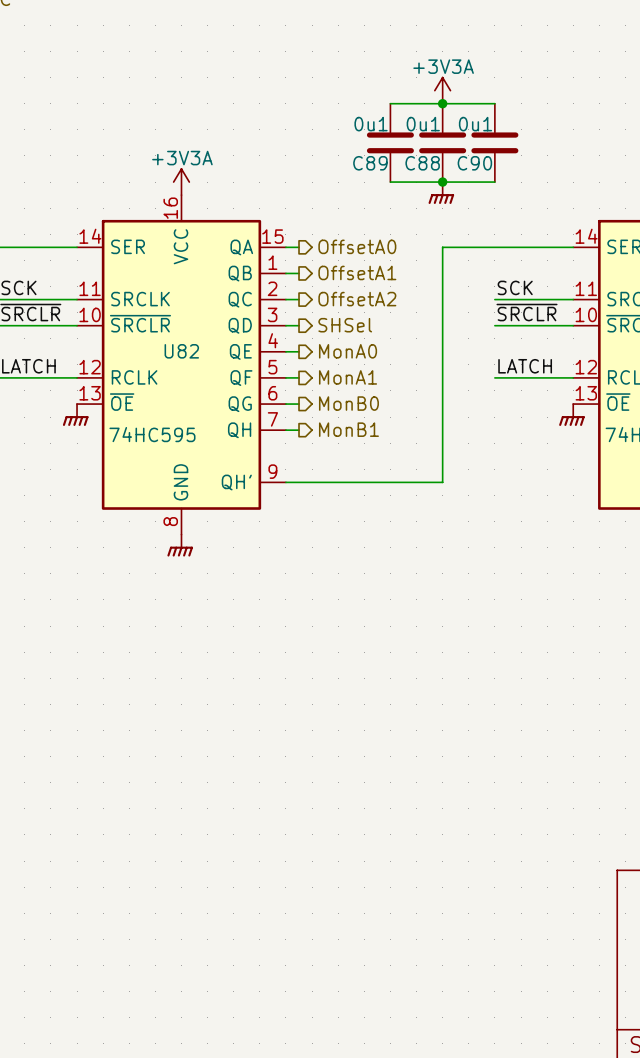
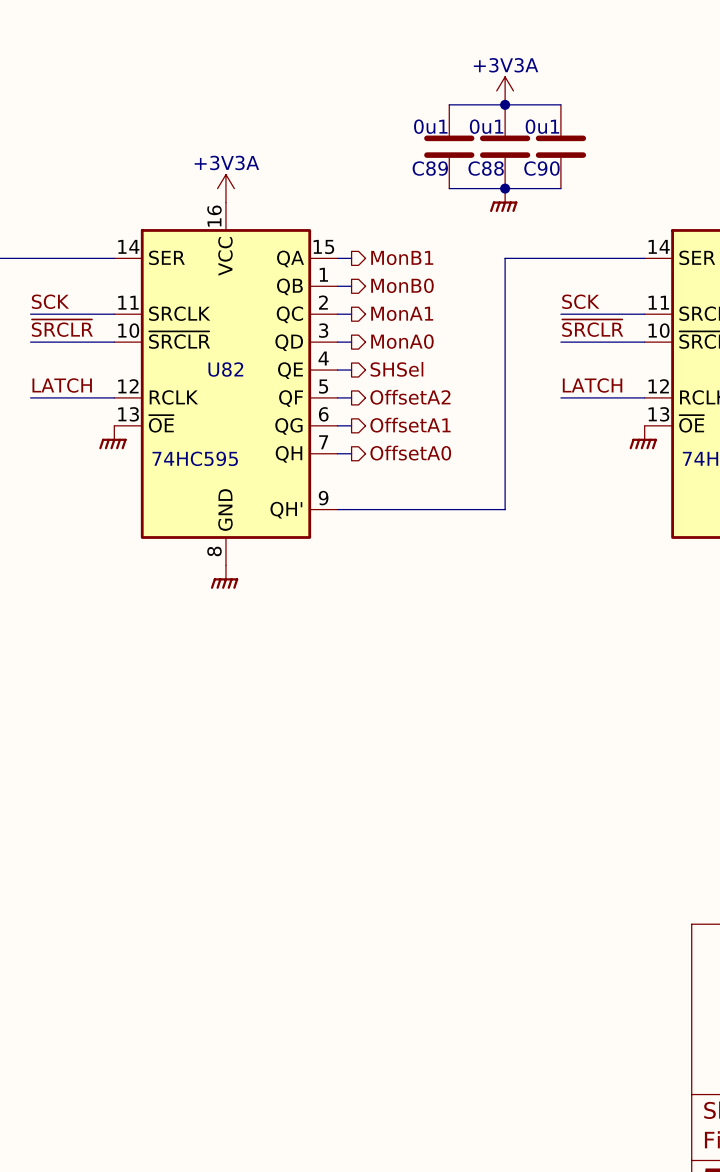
hierarchical label: OffsetA0 (357, 246) -> MonB1 (402, 257)
hierarchical label: OffsetA1 (357, 272) -> MonB0 (402, 285)
hierarchical label: OffsetA2 (357, 299) -> MonA1 (402, 313)
hierarchical label: SHSel (345, 325) -> MonA0 (402, 341)
hierarchical label: MonA0 (348, 351) -> SHSel (396, 369)
hierarchical label: MonA1 (348, 377) -> OffsetA2 (410, 397)
hierarchical label: MonB0 (348, 403) -> OffsetA1 (410, 425)
hierarchical label: MonB1 (348, 429) -> OffsetA0 (410, 453)

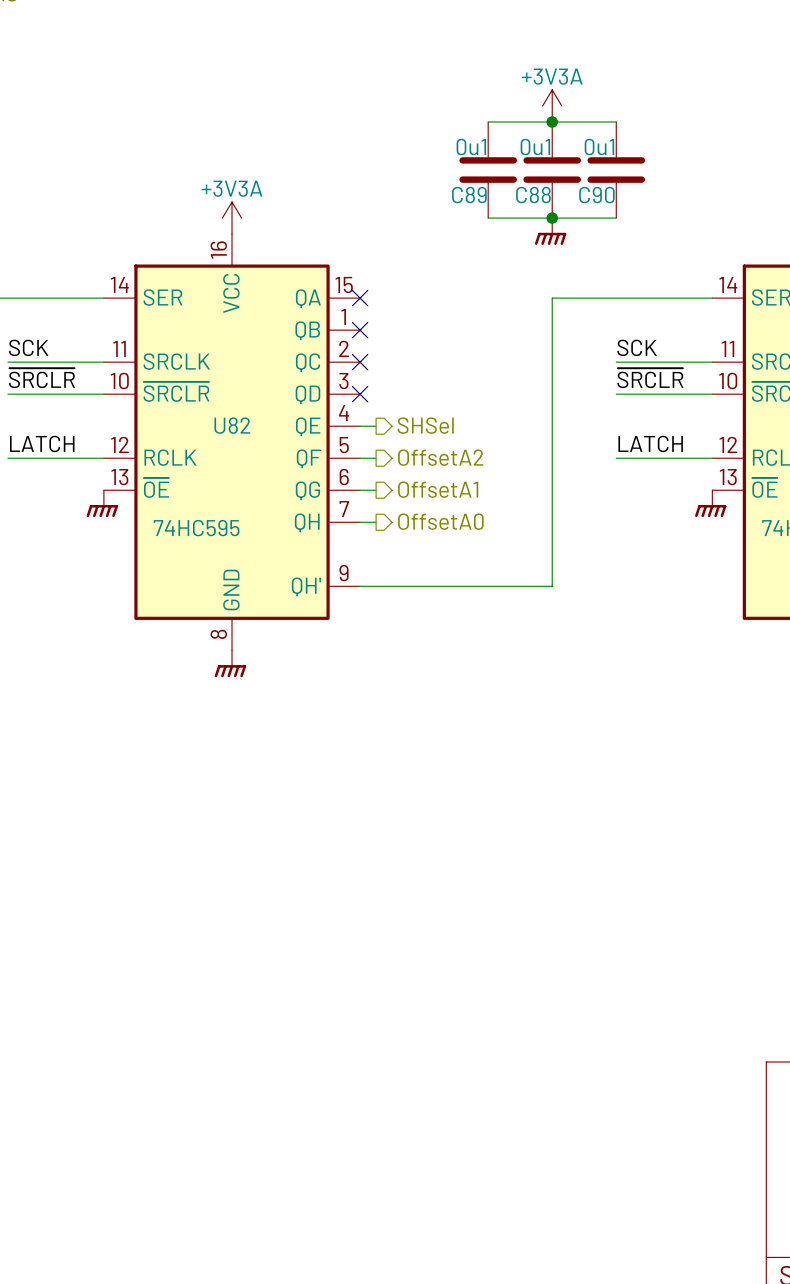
hierarchical label: MonB1 (402, 257) -> none
wire: (337, 258) (351, 258) -> none
no-connect mark: none -> (360, 298)
hierarchical label: MonB0 (402, 285) -> none
wire: (337, 286) (351, 286) -> none
no-connect mark: none -> (360, 330)
hierarchical label: MonA1 (402, 313) -> none
wire: (337, 314) (351, 314) -> none
no-connect mark: none -> (360, 362)
hierarchical label: MonA0 (402, 341) -> none
wire: (337, 342) (351, 342) -> none
no-connect mark: none -> (360, 394)

